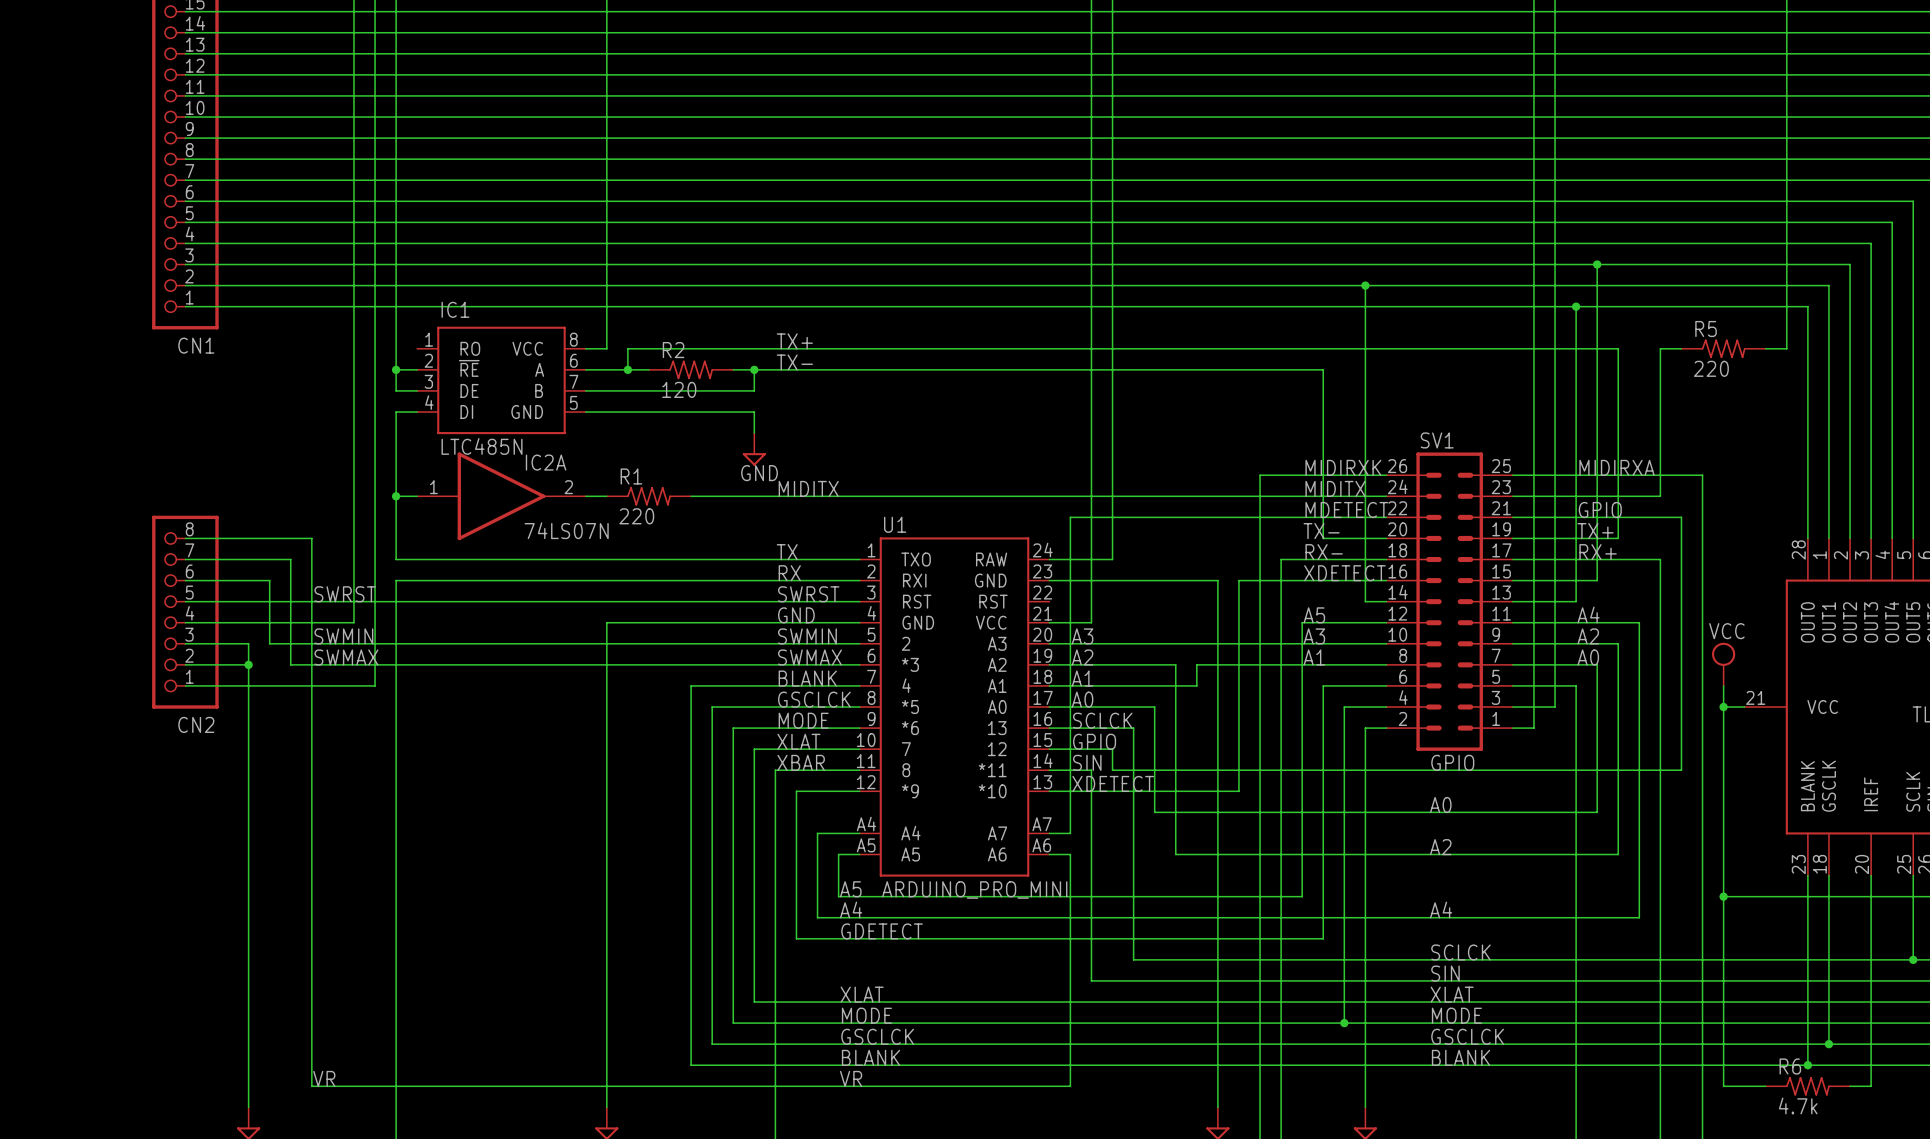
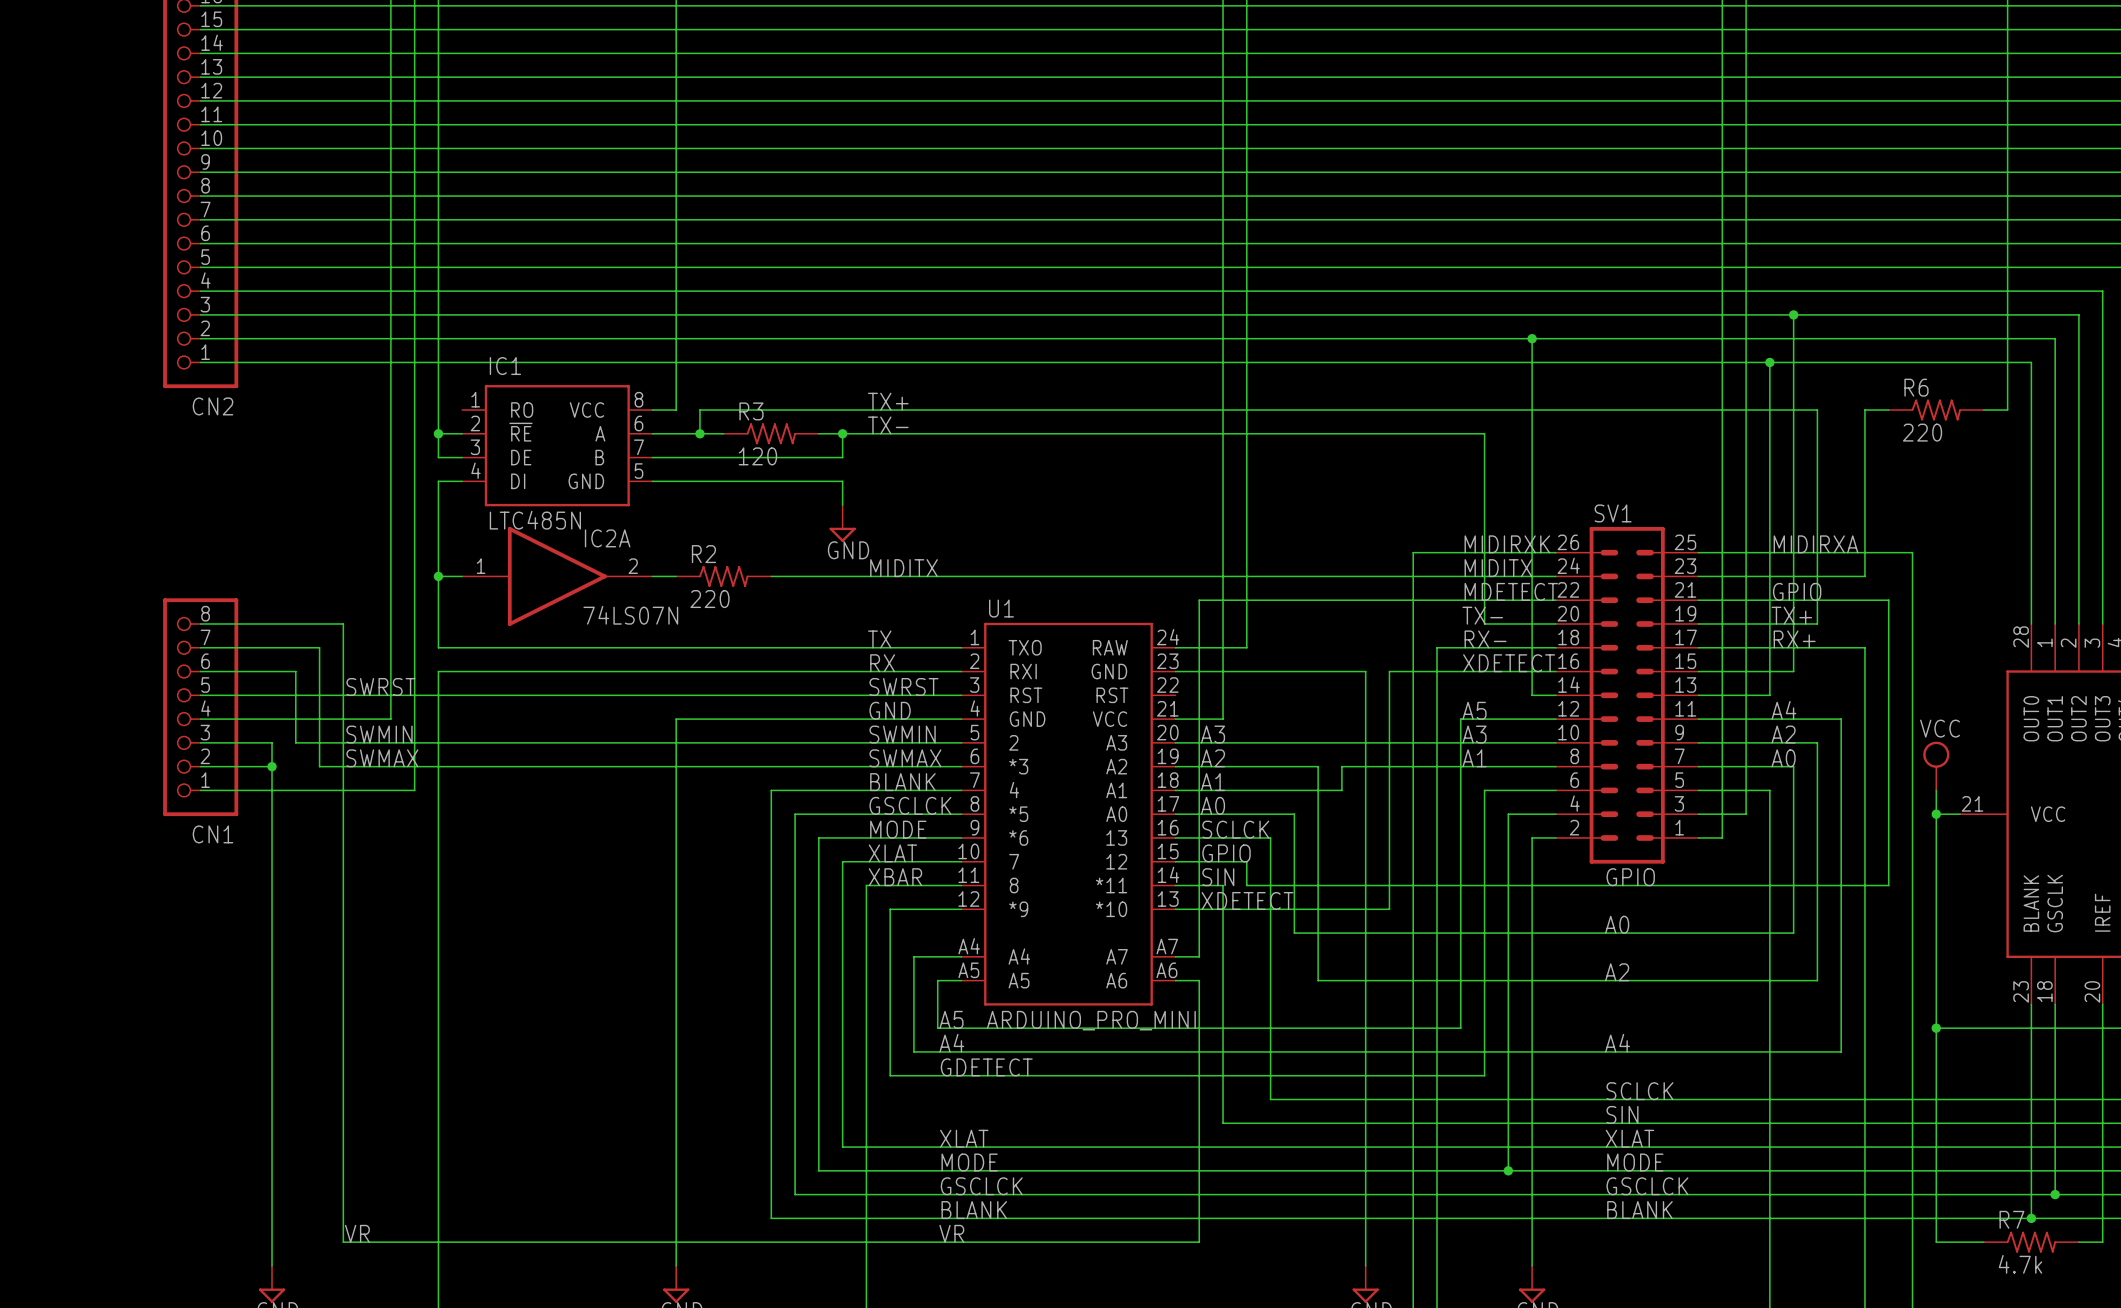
R5 name: R5 (1706, 328) -> R6 (1916, 387)
CN1 name: CN1 (196, 345) -> CN2 (213, 406)
R2 name: R2 (673, 350) -> R3 (751, 411)
R1 name: R1 (631, 476) -> R2 (703, 554)
CN2 name: CN2 (196, 724) -> CN1 (213, 834)
R6 name: R6 (1790, 1066) -> R7 (2011, 1219)

